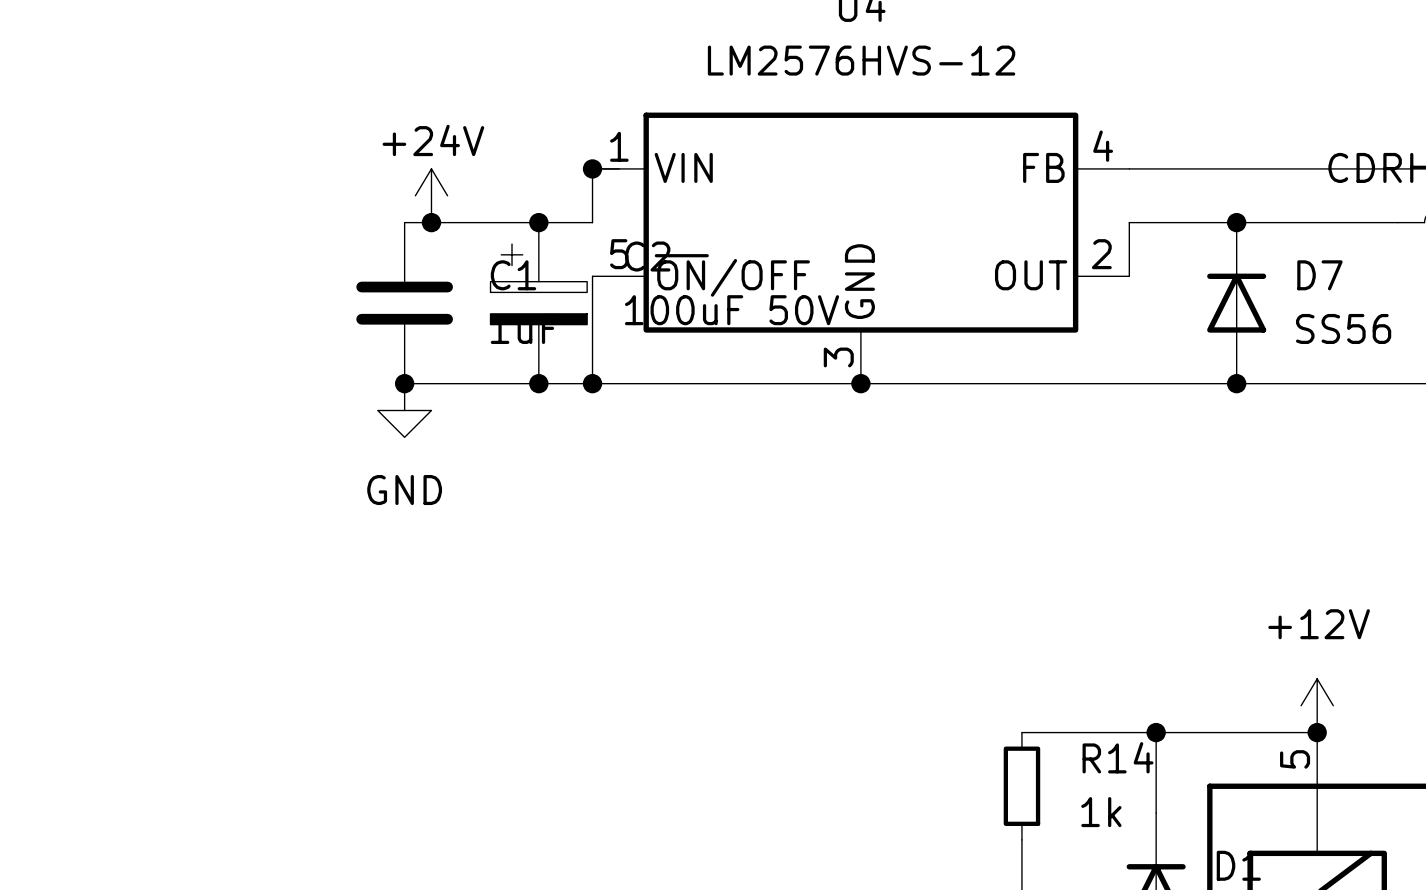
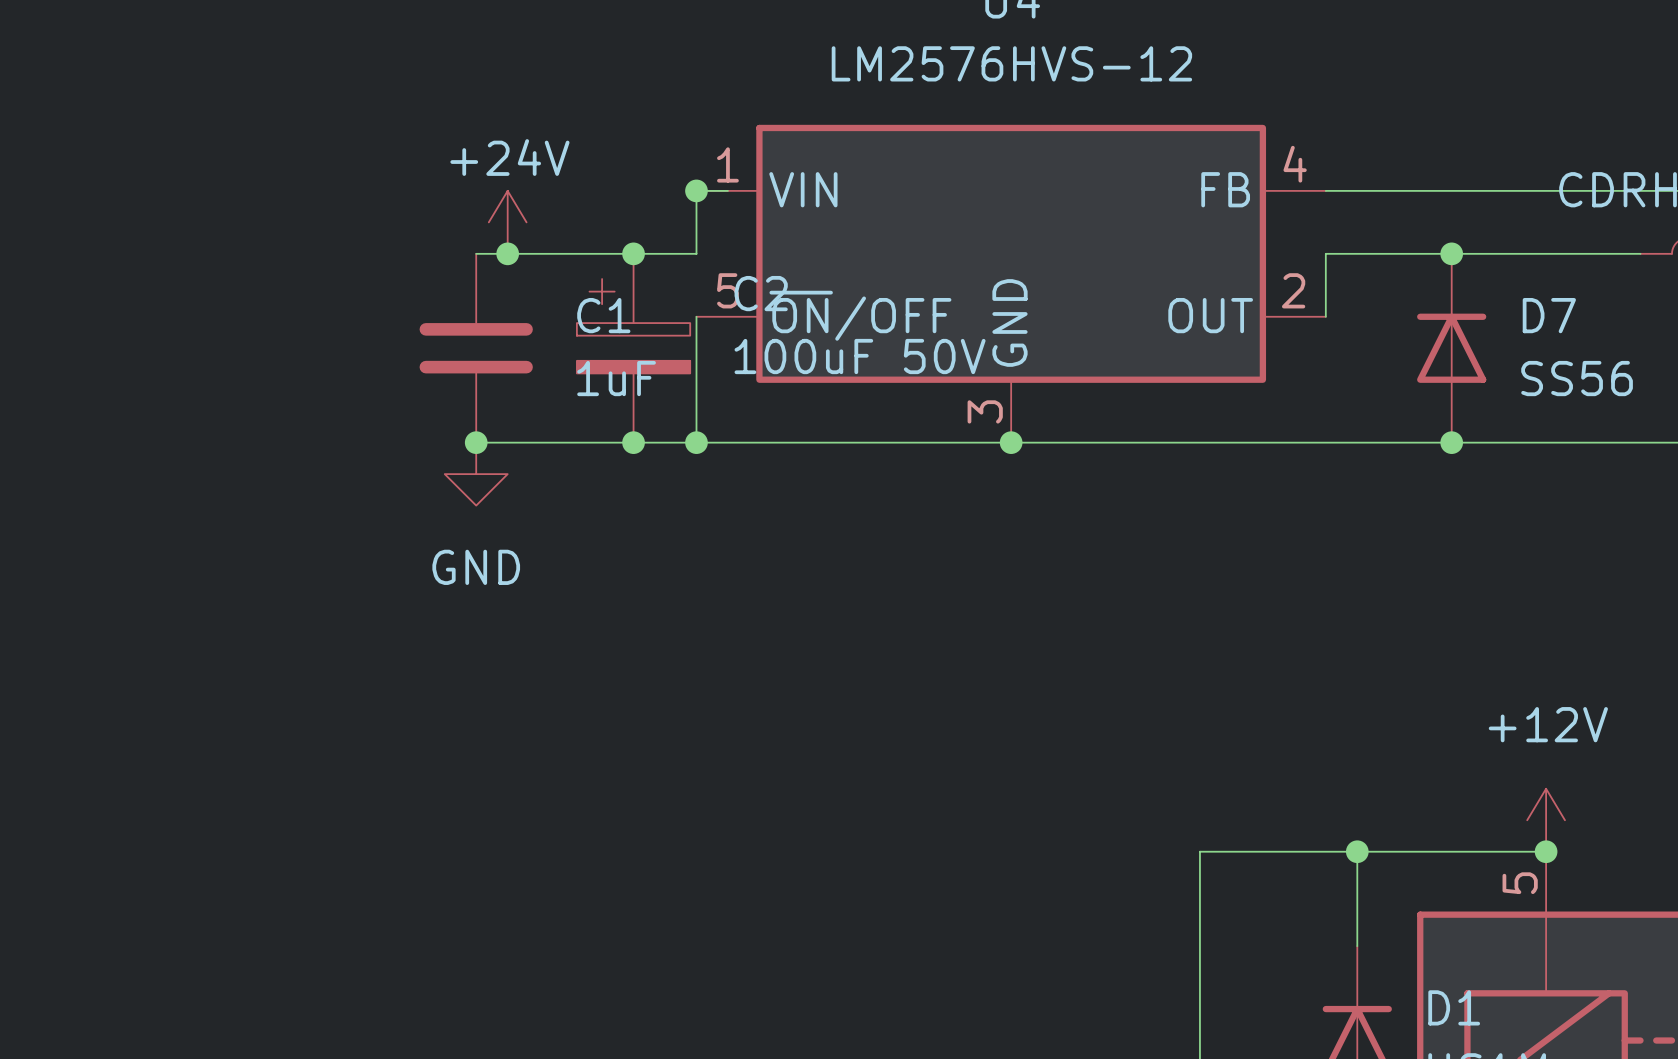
wire: none -> (1199, 851) (1199, 977)
R14: 1k (1021, 786) -> none

